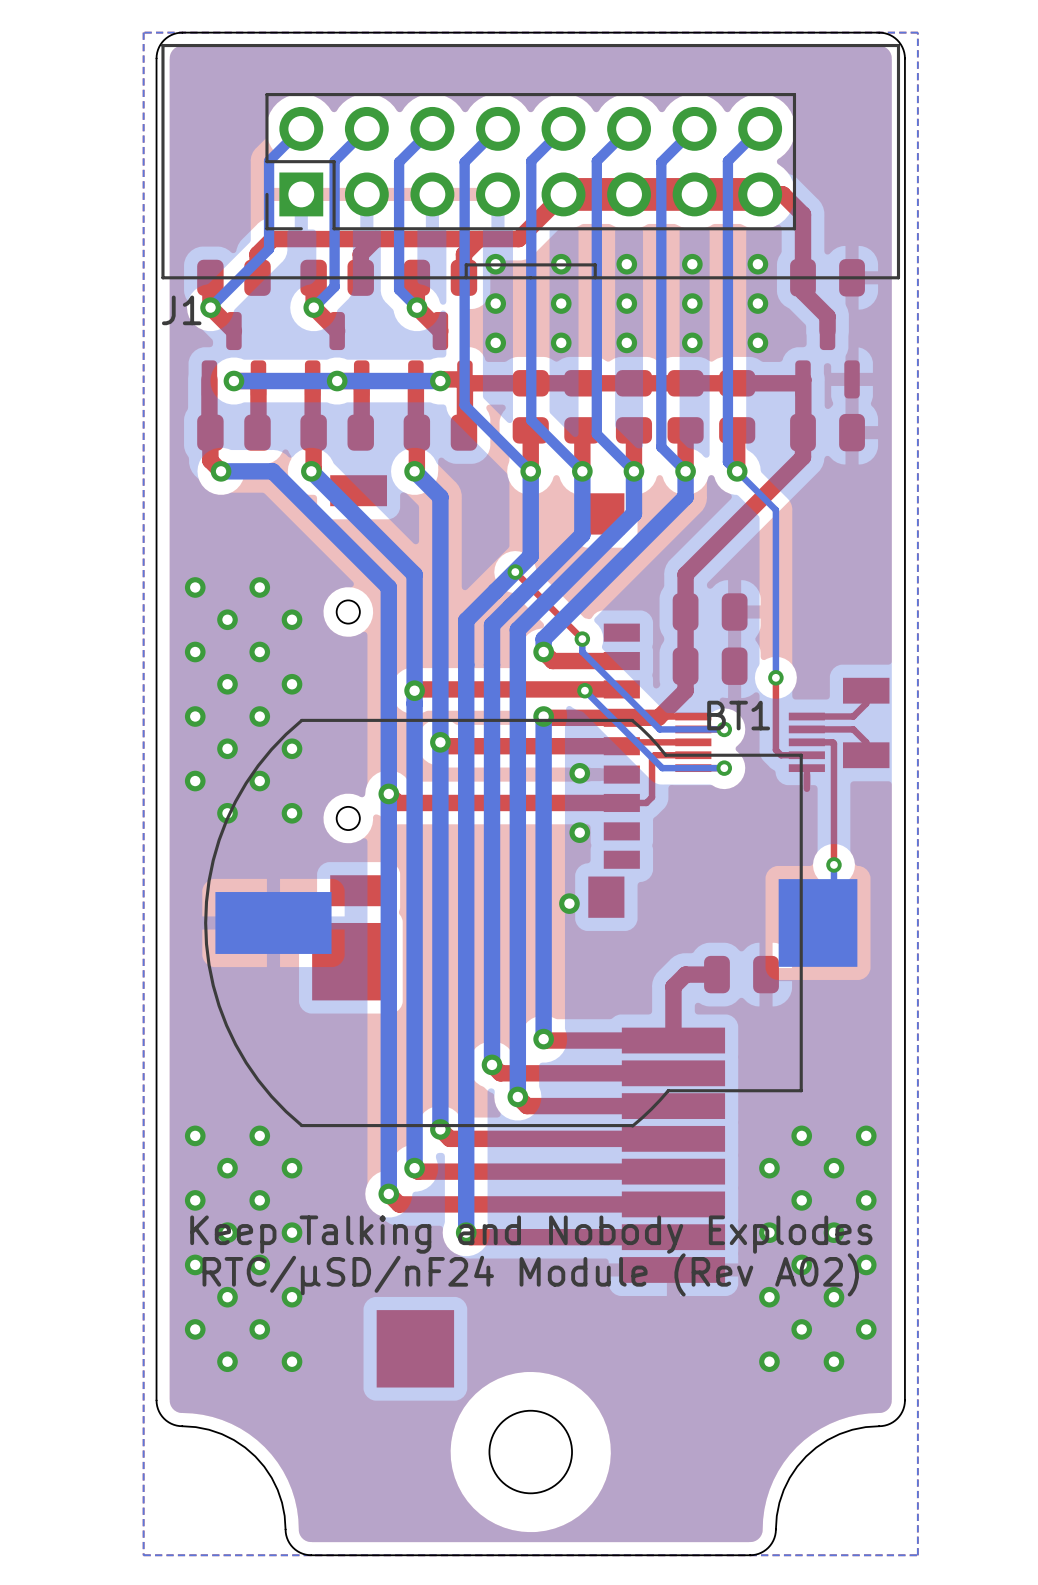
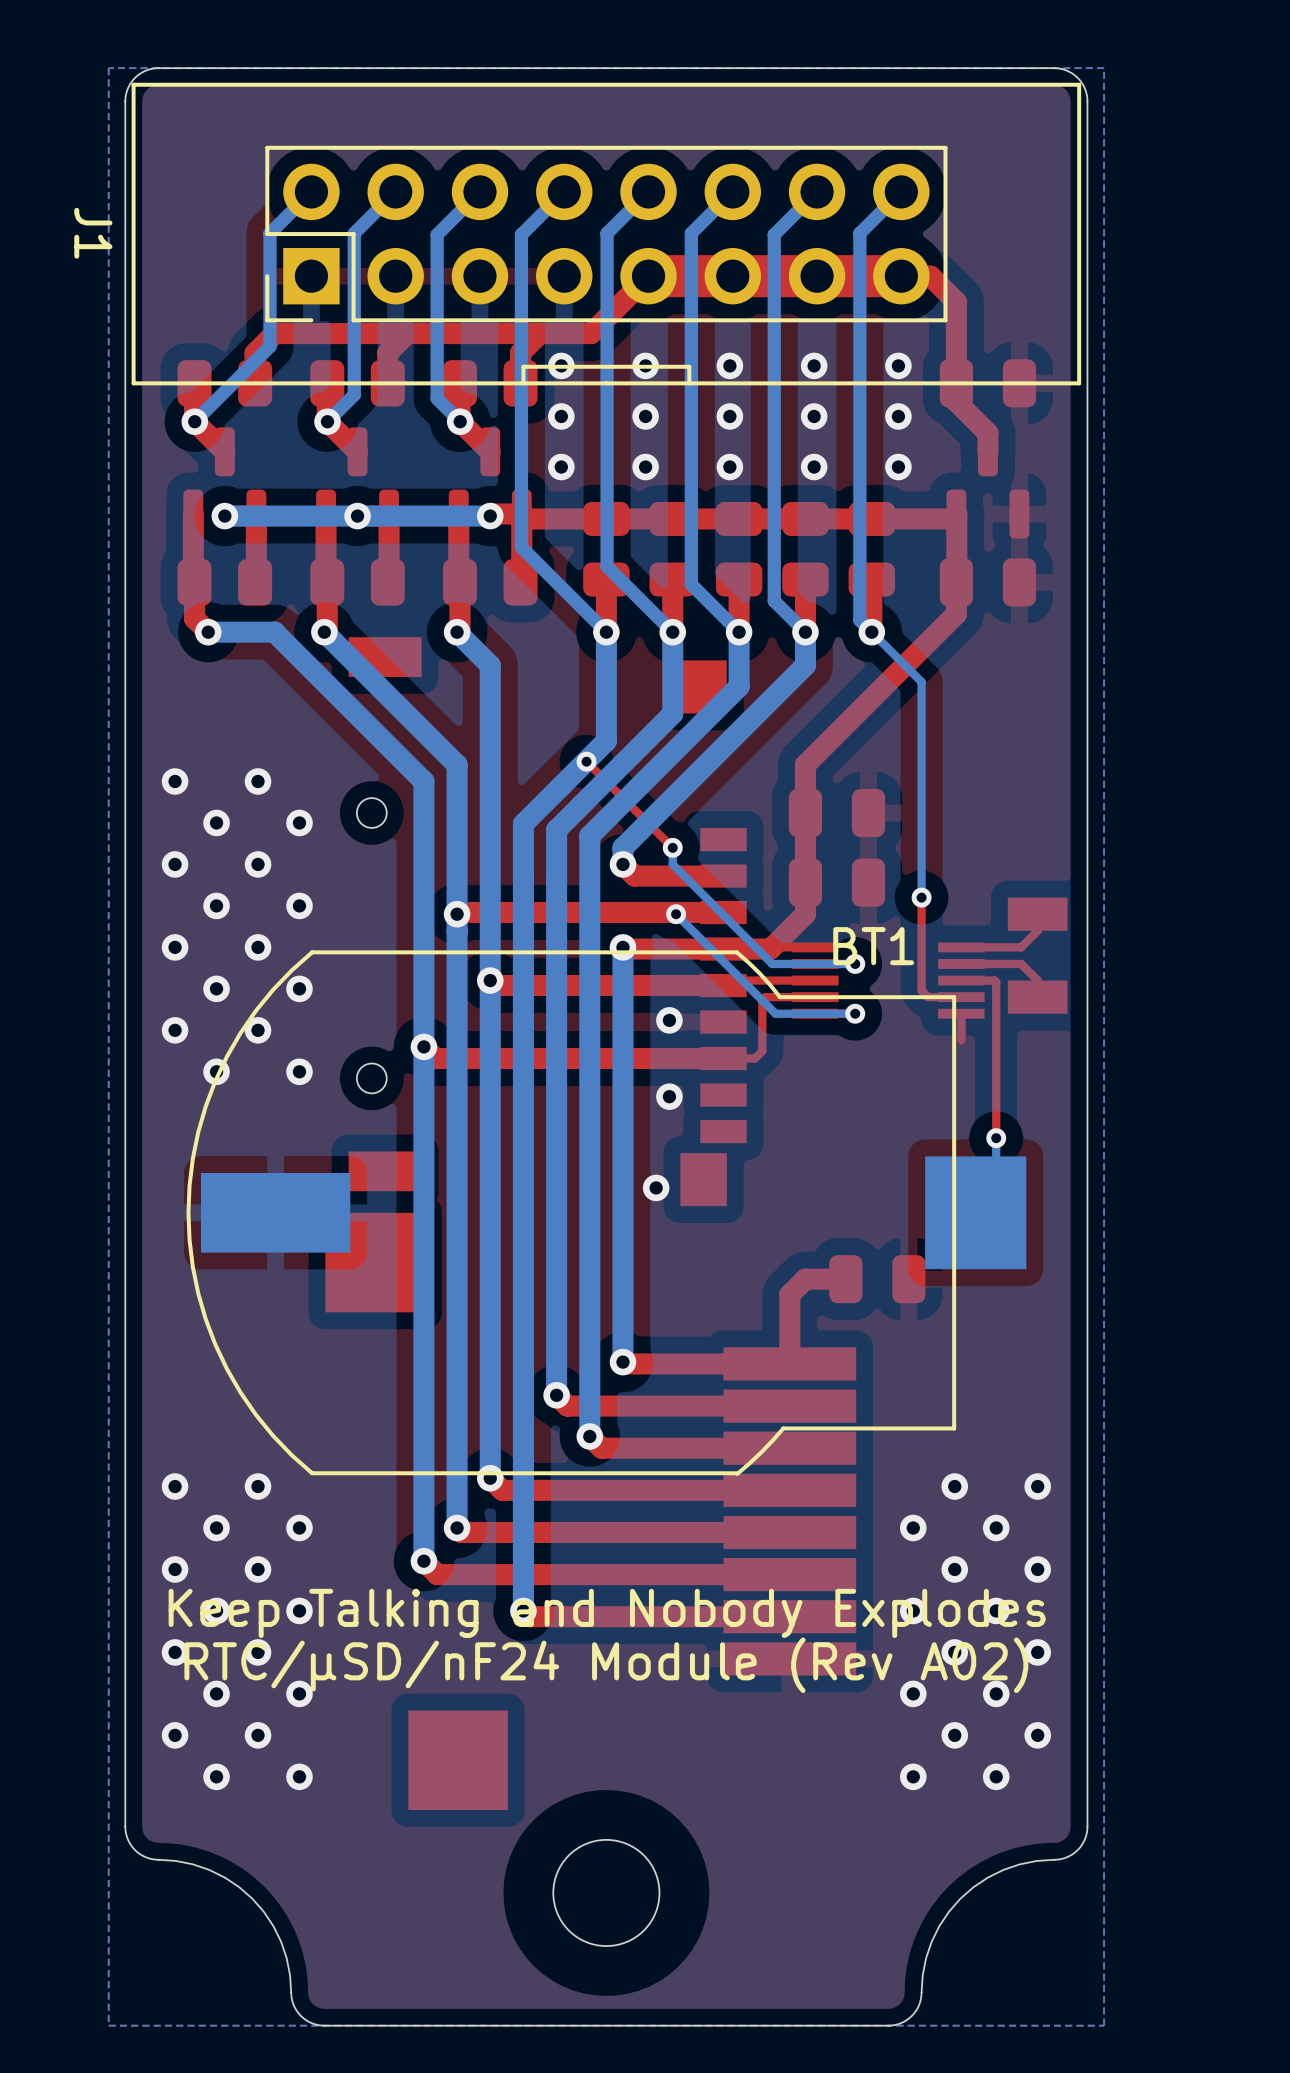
J1 name rotation: 0° (181, 310) -> 90° clockwise (93, 233)
J1 name position: J1 (181, 310) -> J1 (93, 233)

